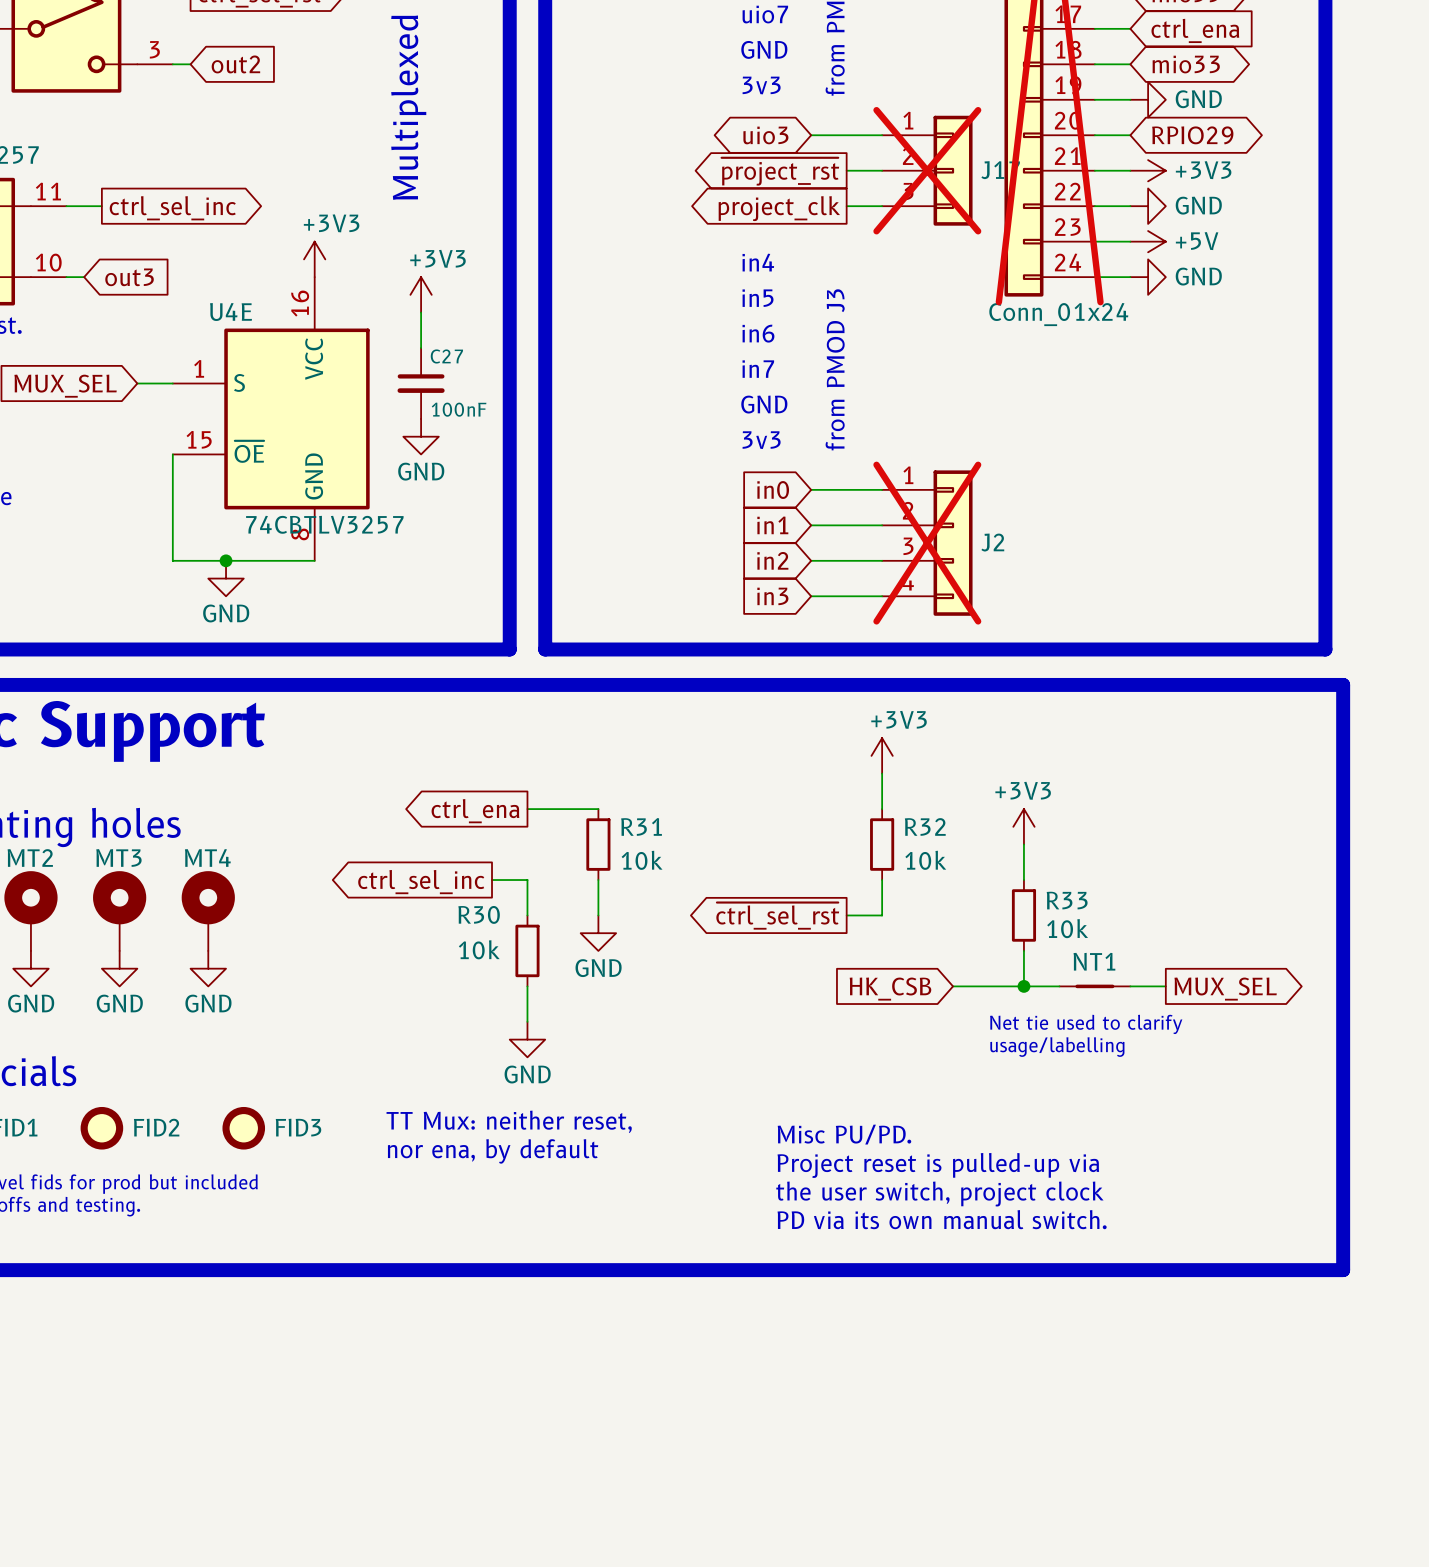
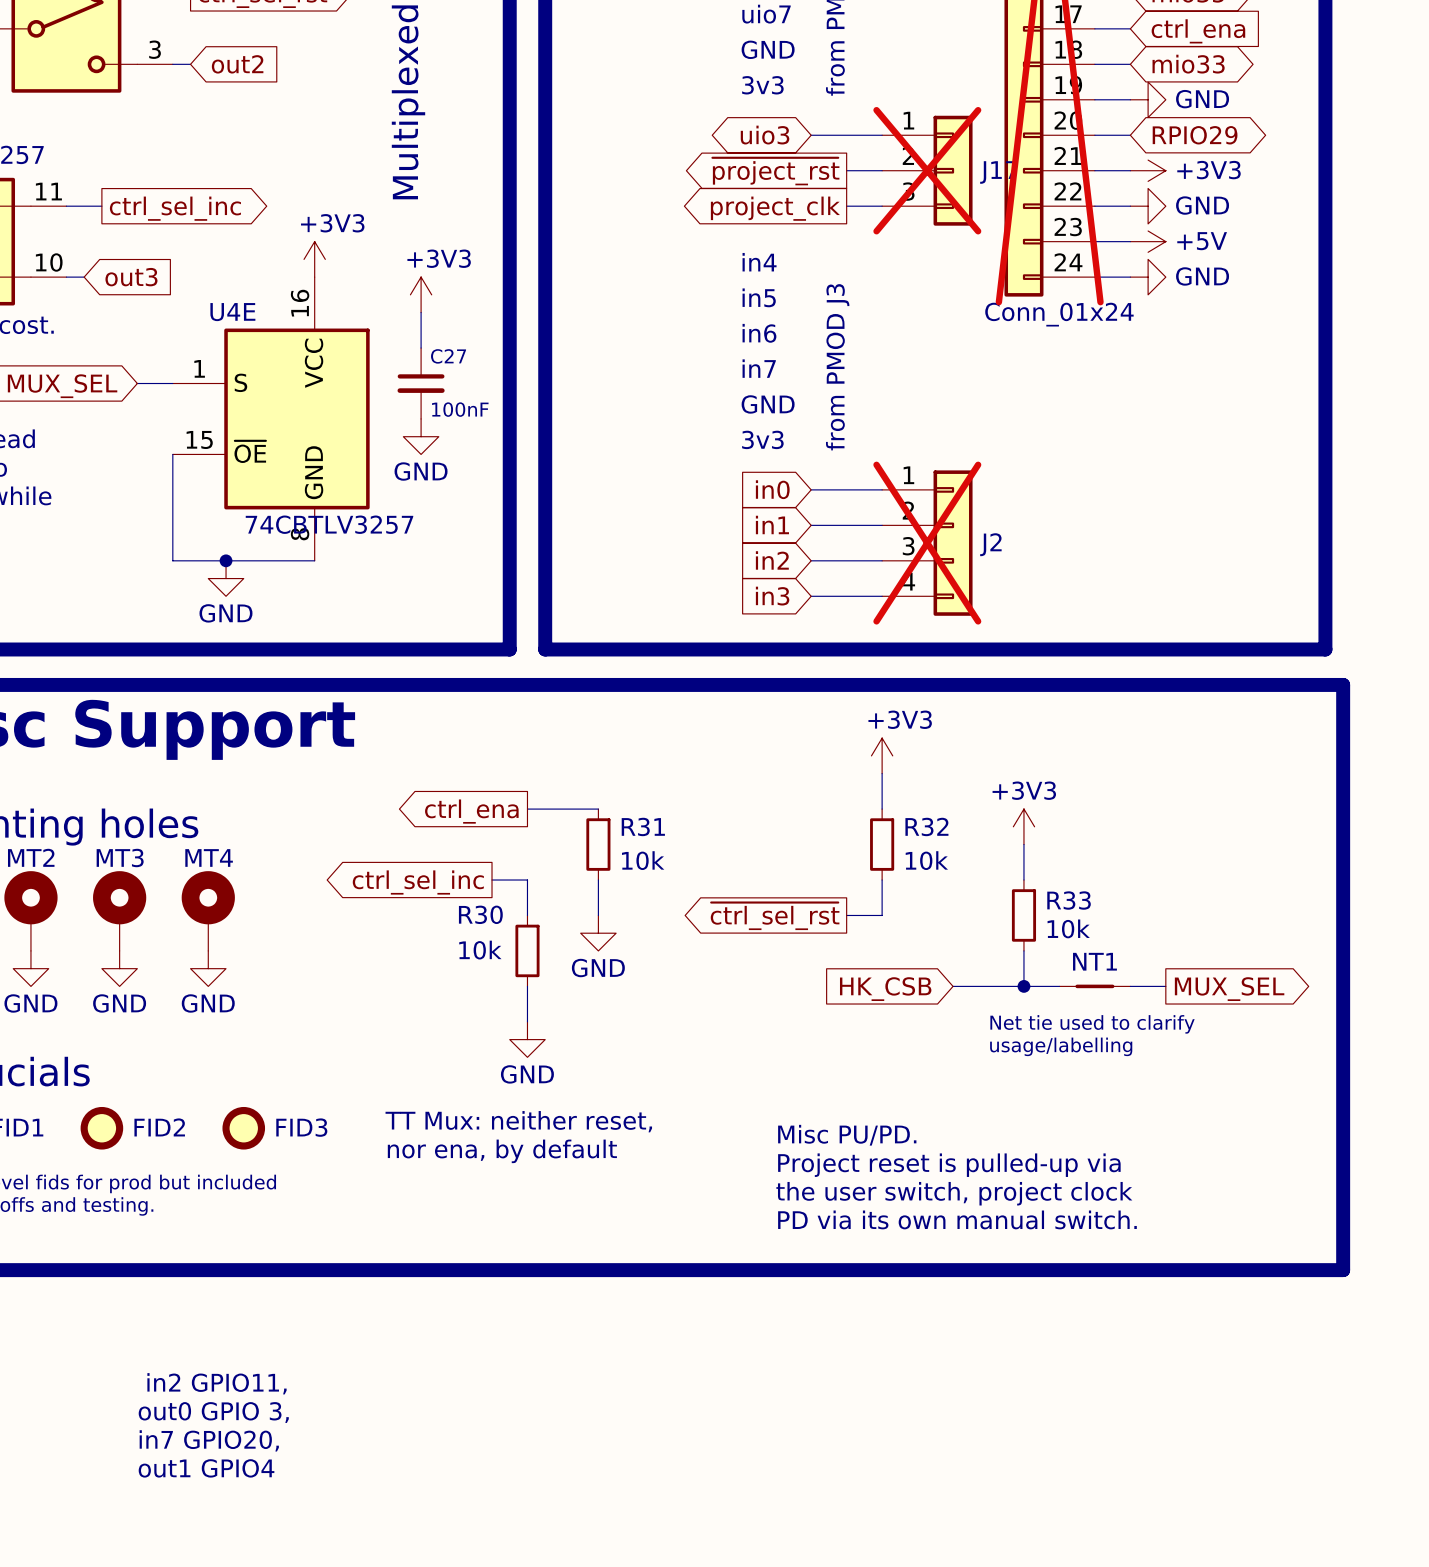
text: none -> in2 GPIO11, (216, 1383)
text: none -> out0 GPIO 3, (213, 1412)
text: none -> in7 GPIO20, (209, 1440)
text: none -> out1 GPIO4 (206, 1468)

